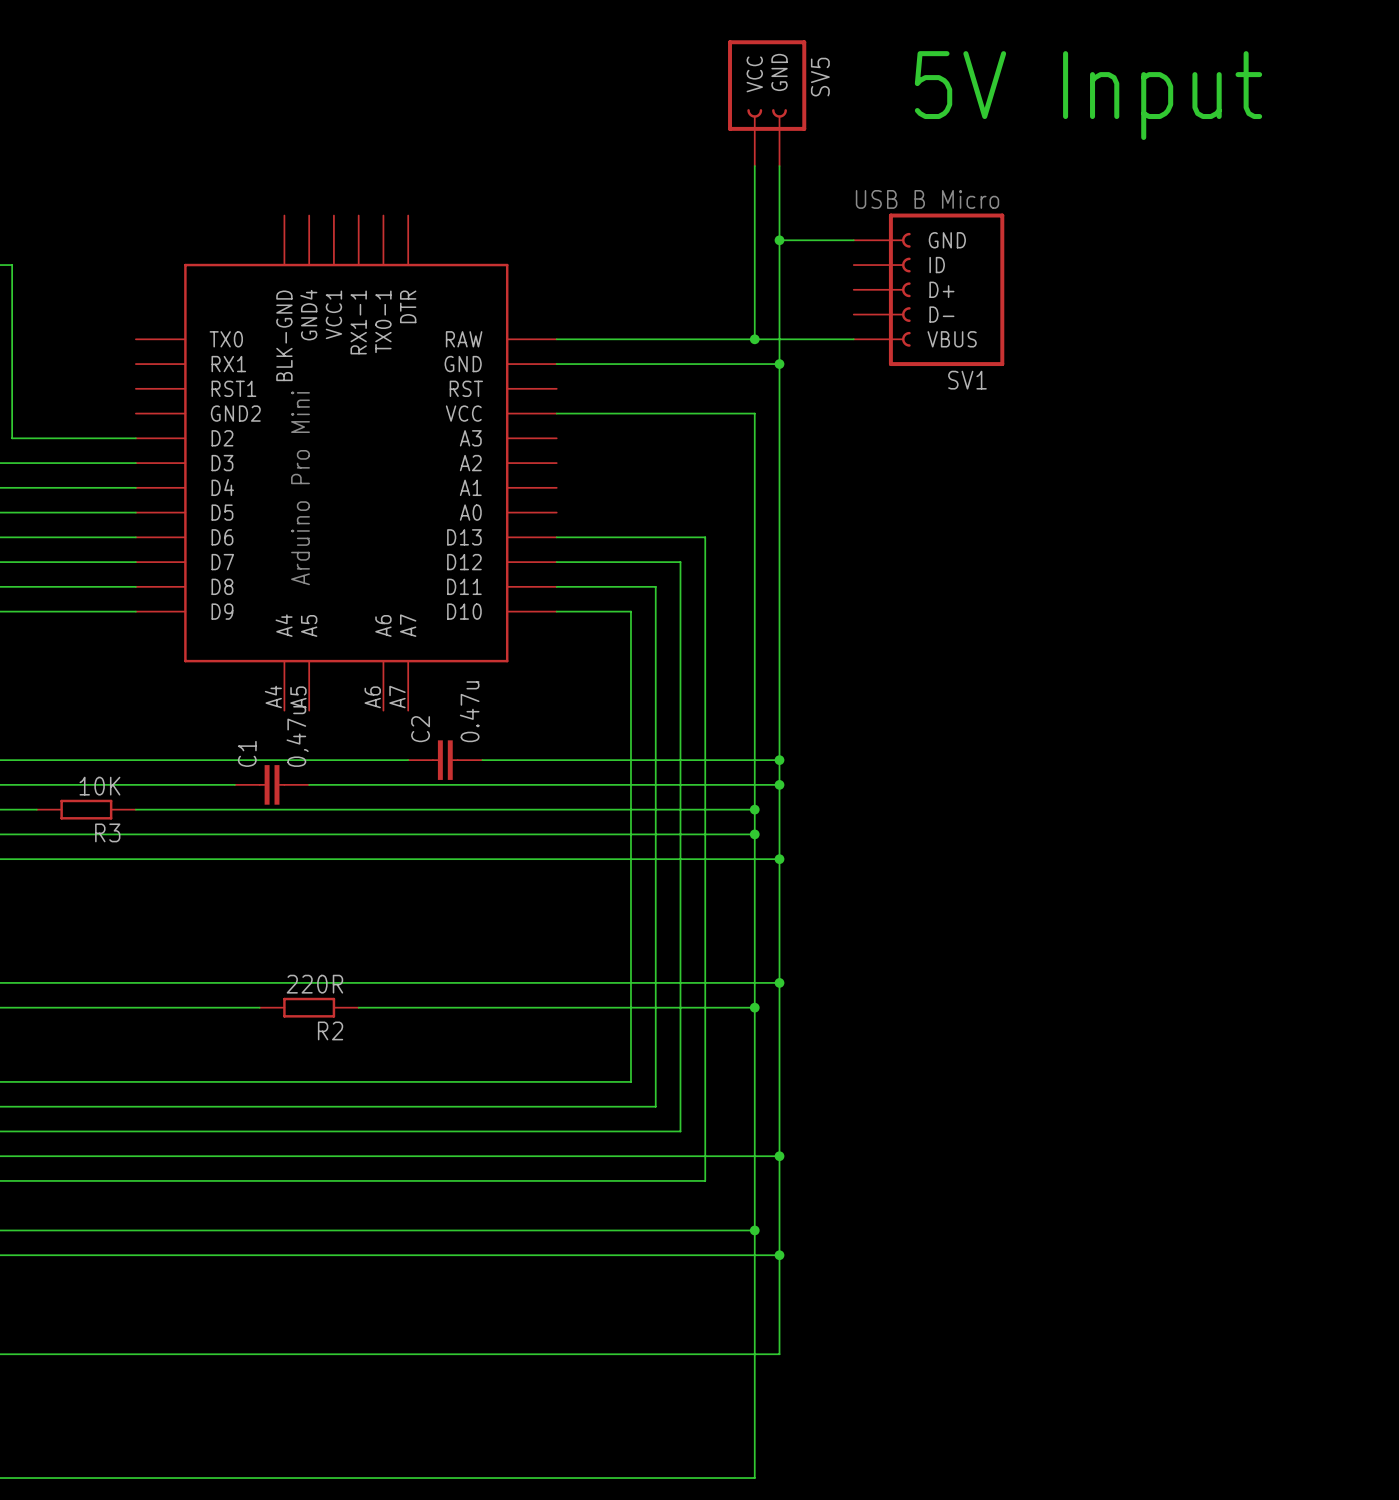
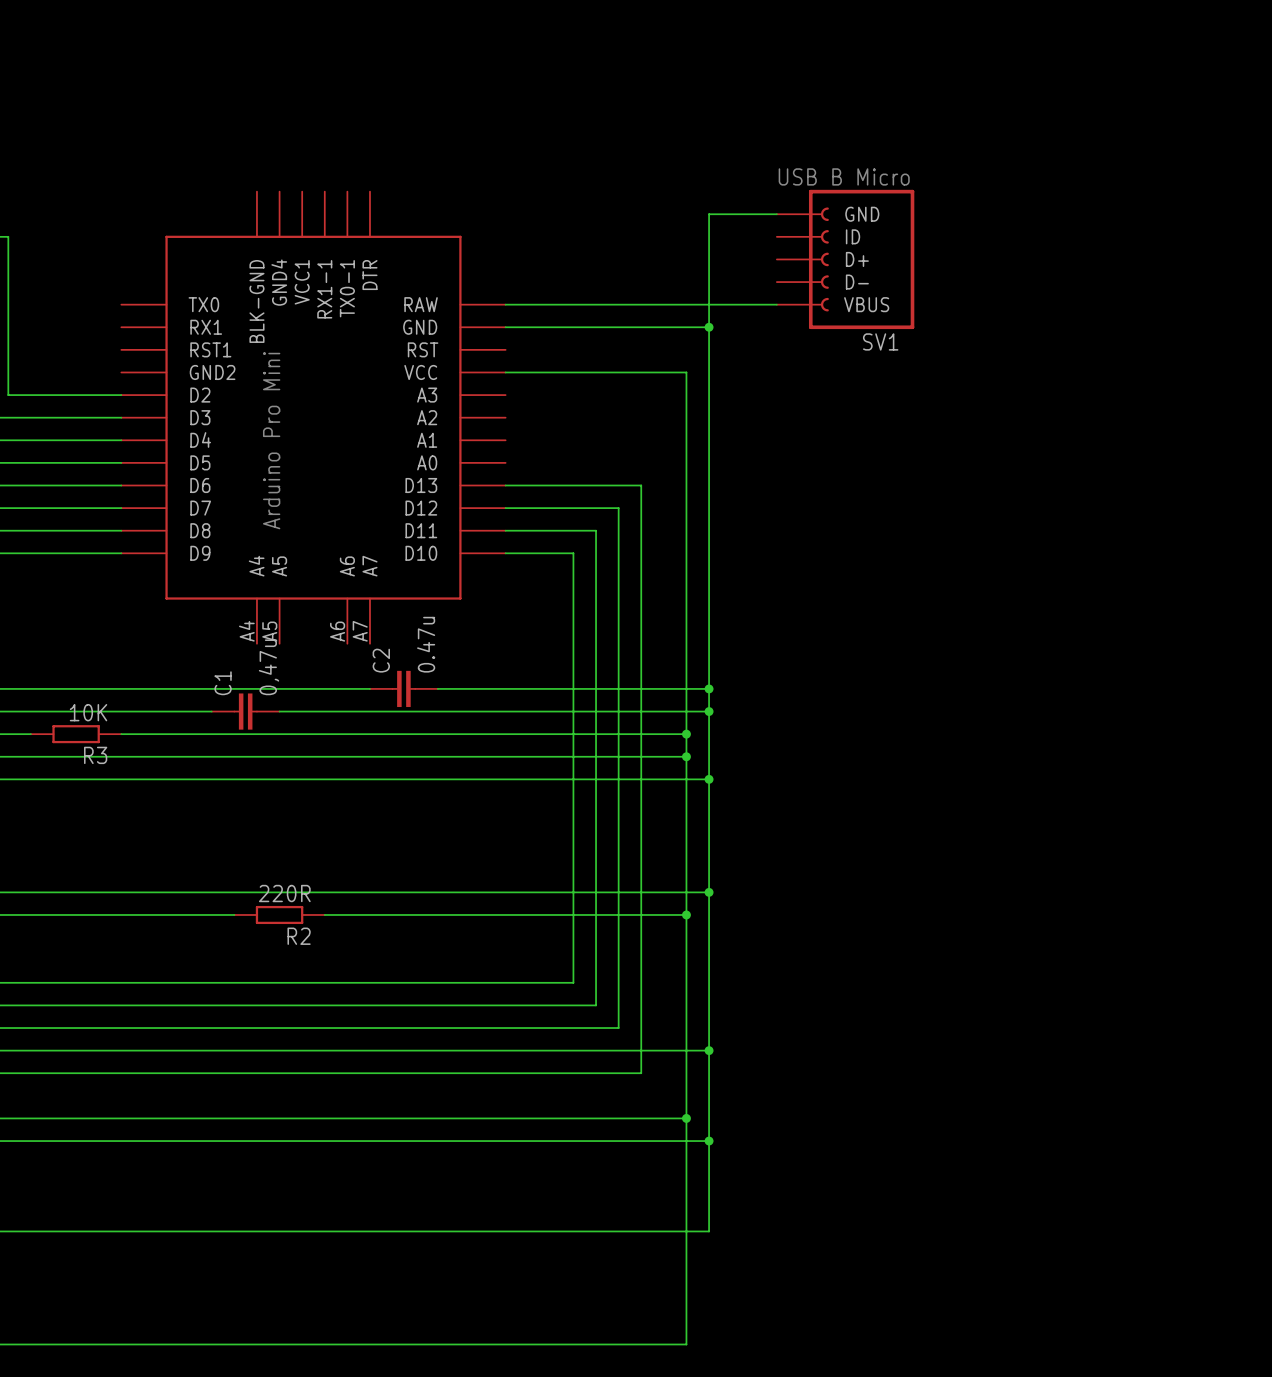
text: 5V Input (1088, 95) -> none
SV5: (767, 103) -> none
wire: (754, 166) (754, 339) -> none
wire: (779, 166) (779, 240) -> none
junction: (779, 240) -> none
junction: (754, 339) -> none

